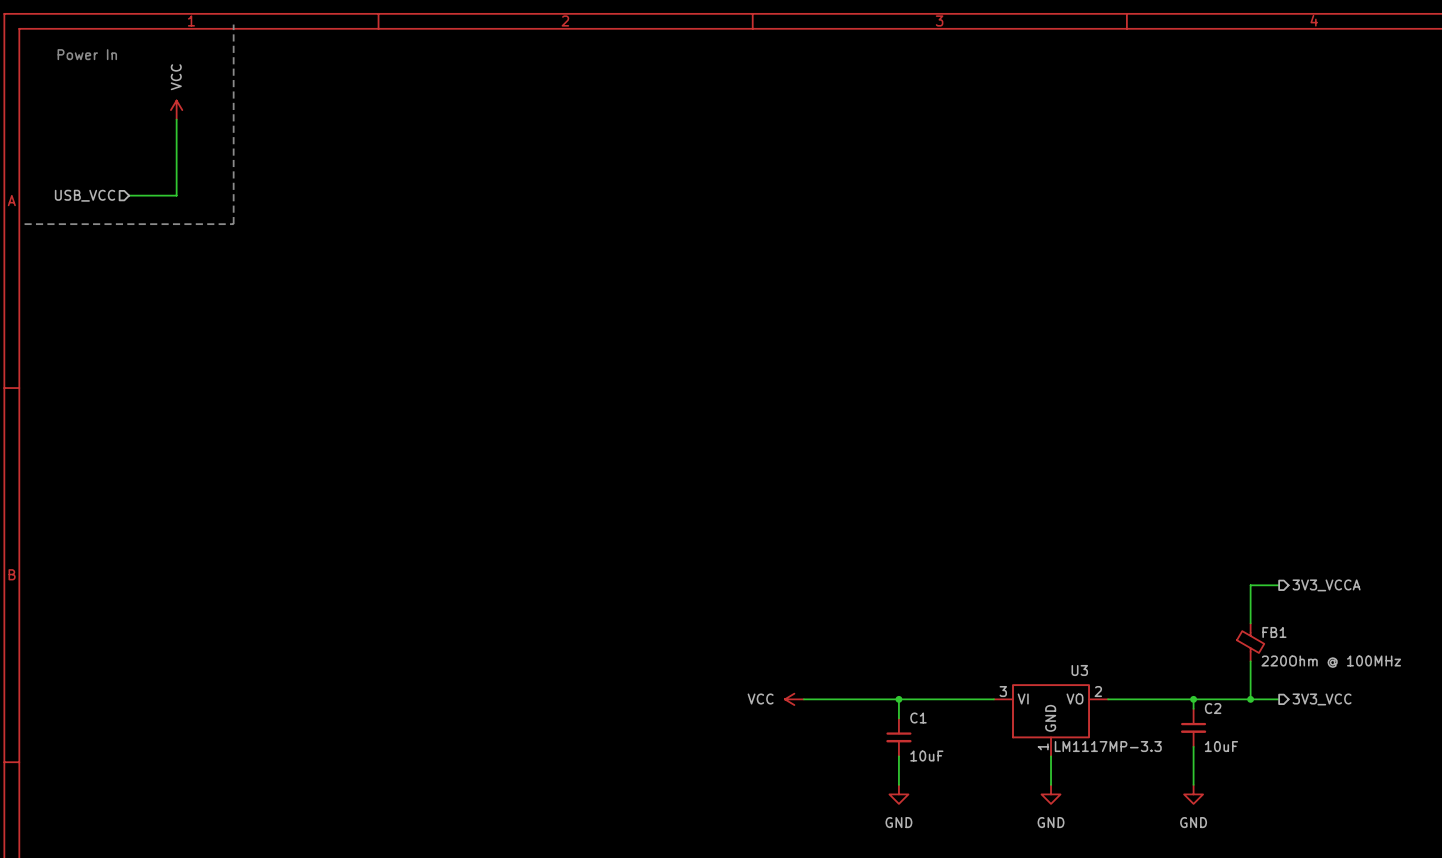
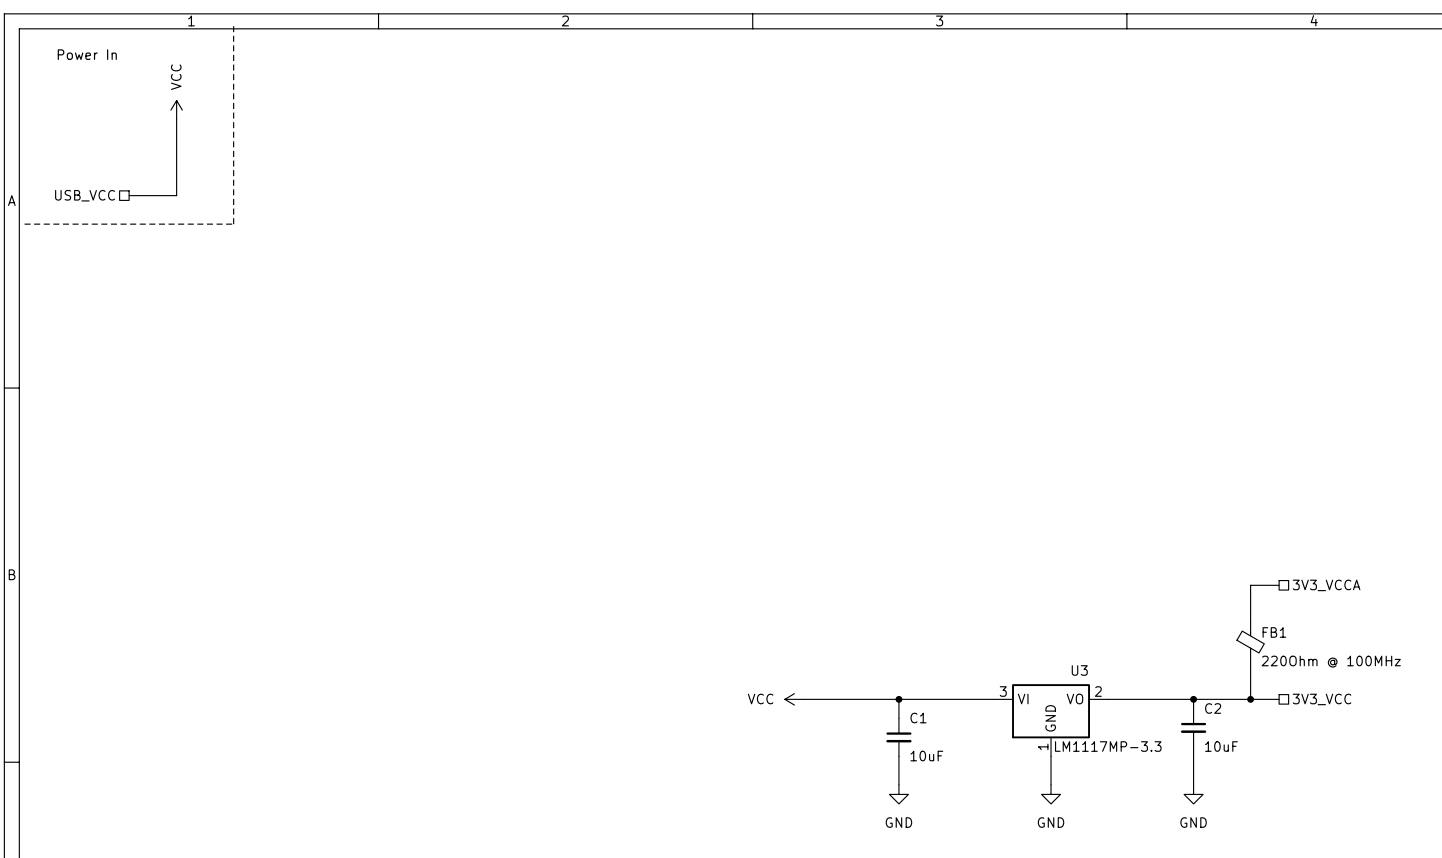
hierarchical label shape: input (85, 195) -> passive (85, 195)
hierarchical label shape: output (1326, 585) -> passive (1326, 585)
hierarchical label shape: output (1322, 699) -> passive (1322, 699)

